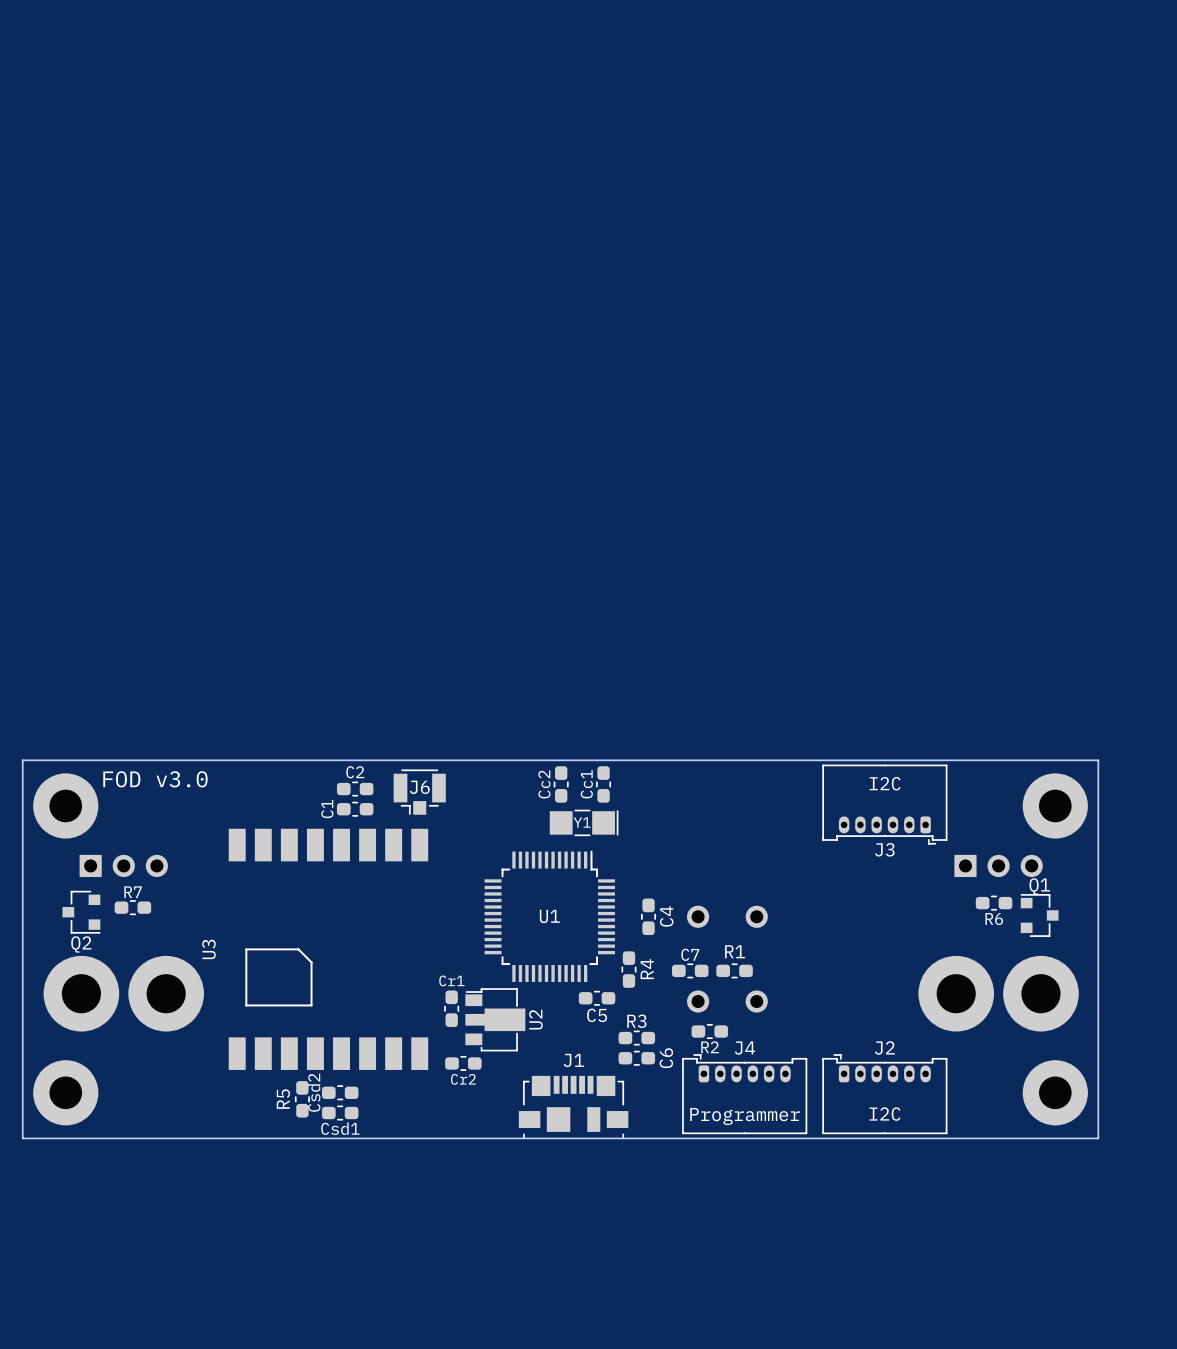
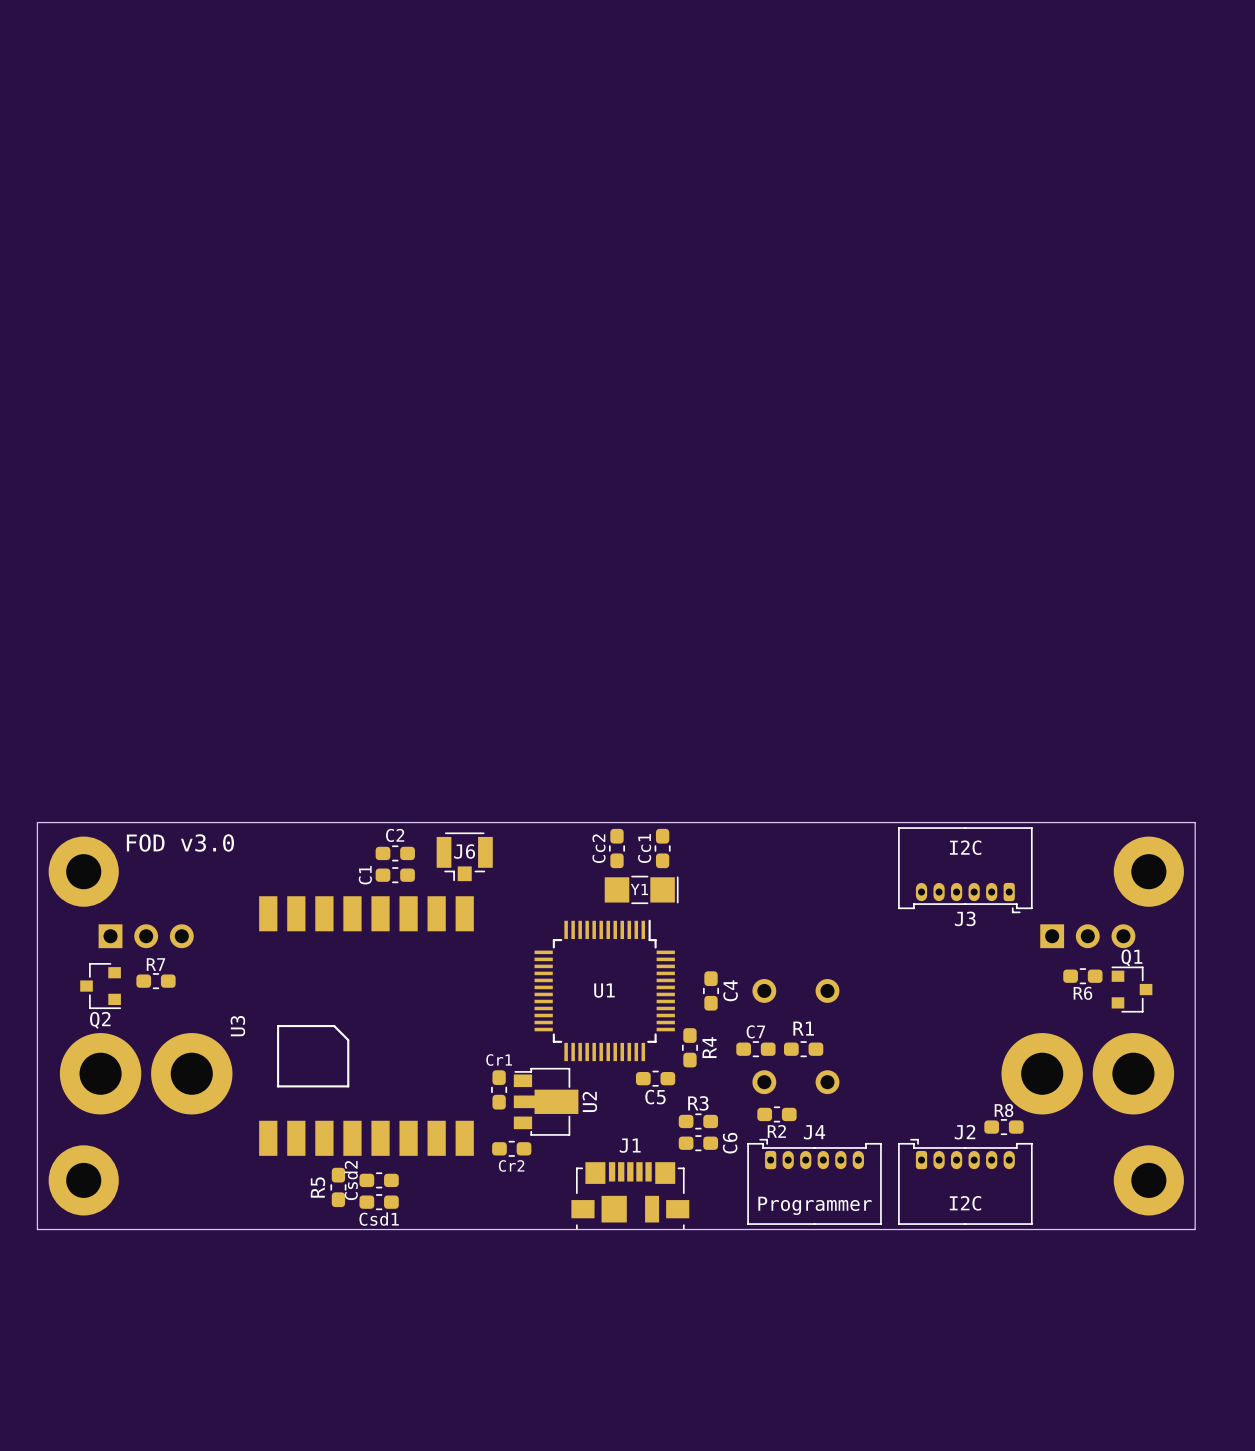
R8: none -> (1003, 1127)

